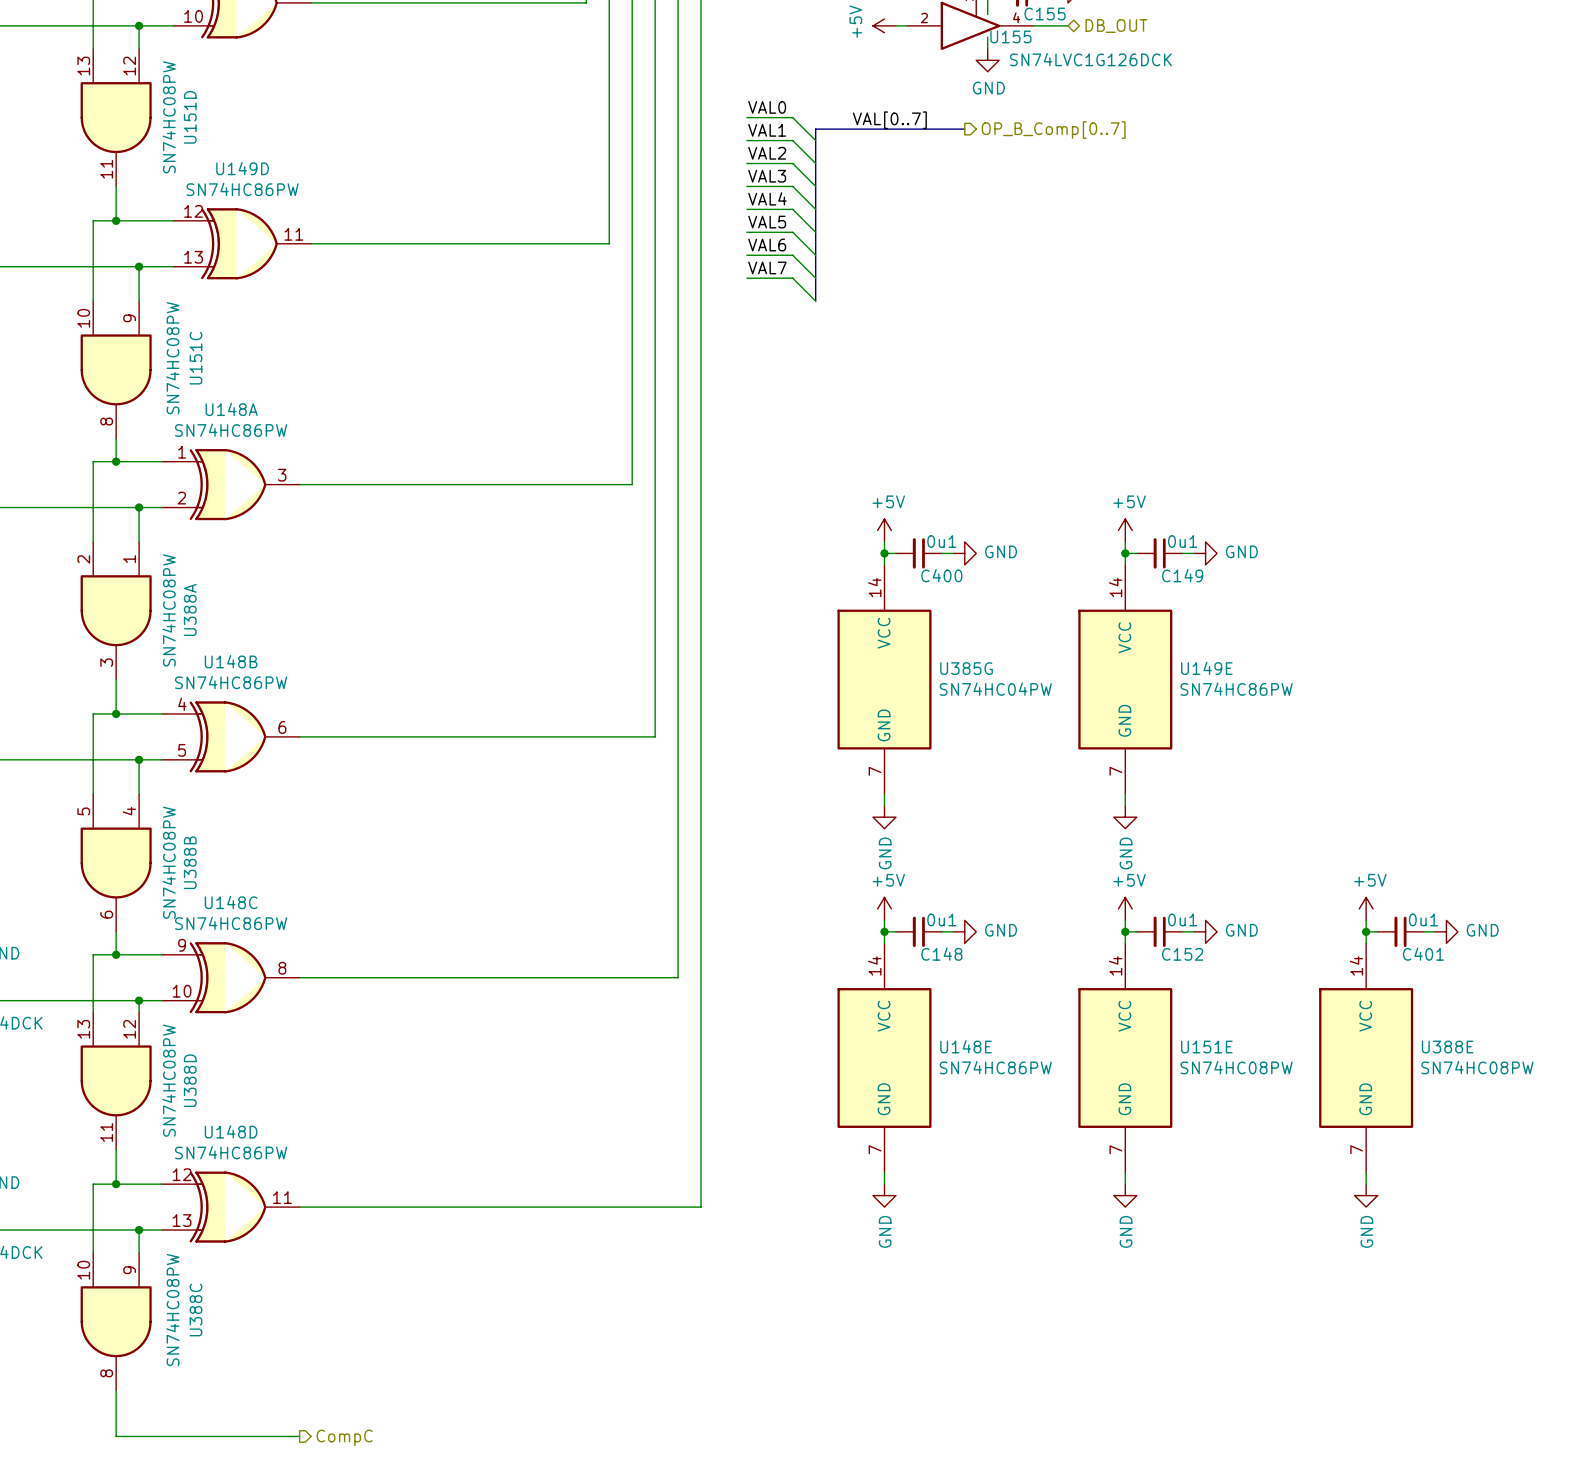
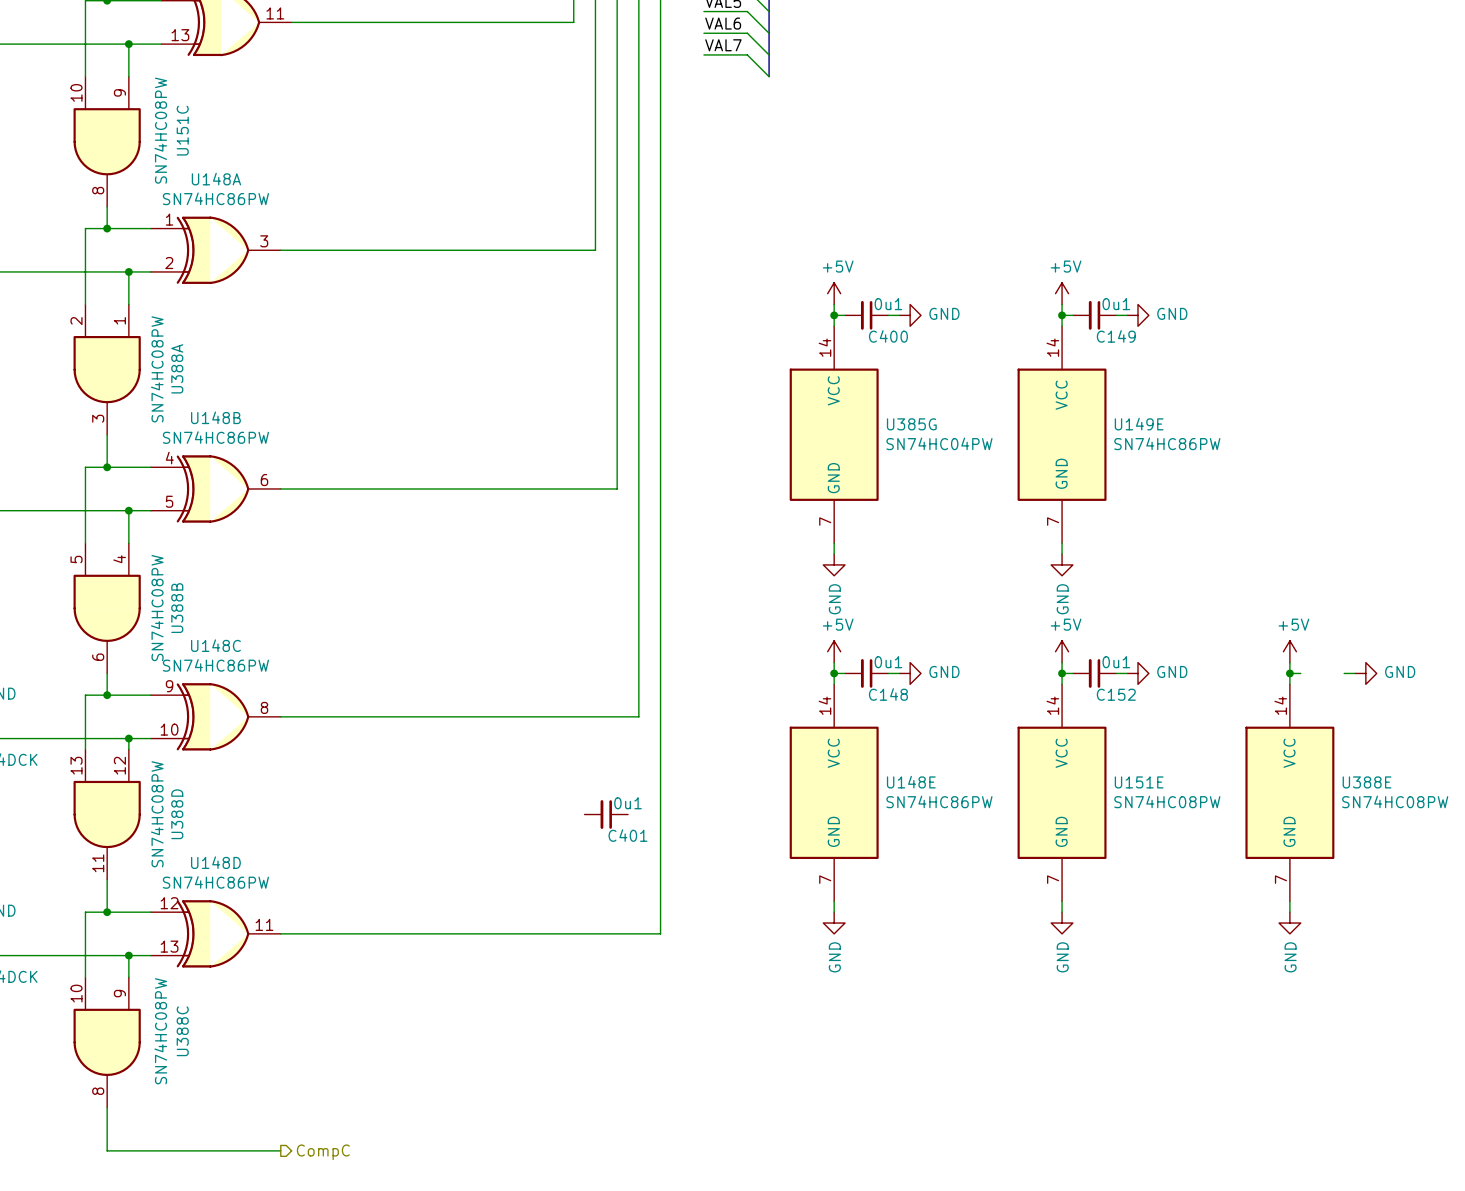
C401 position: (1400, 931) -> (606, 814)

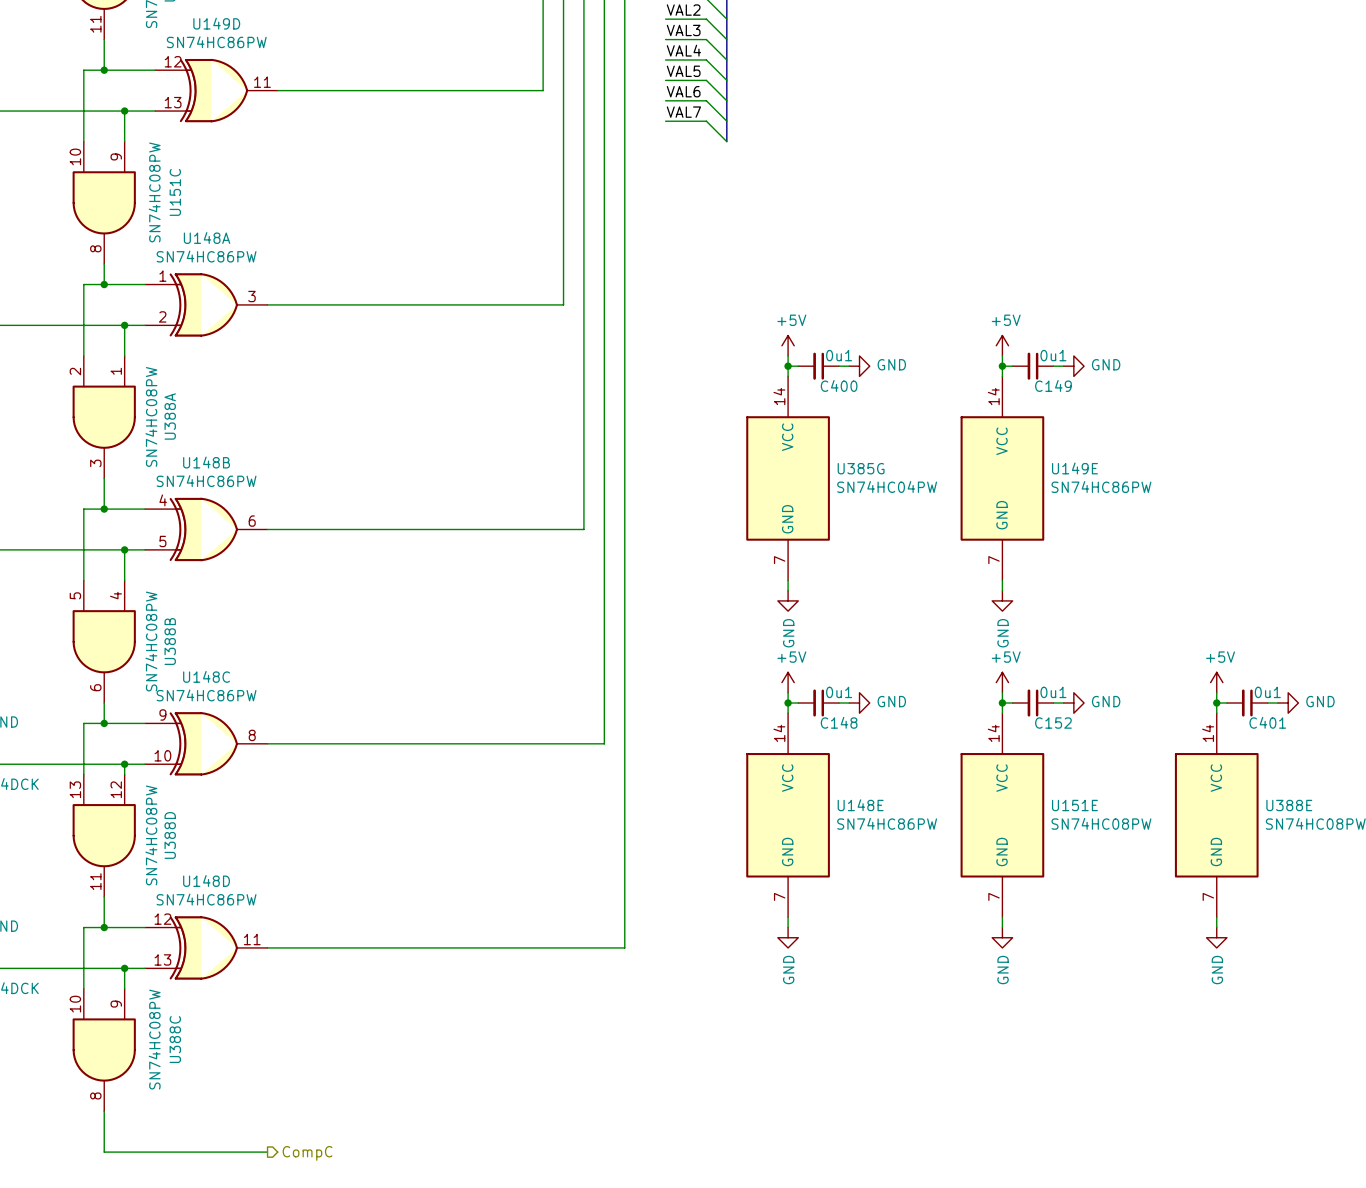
C401 position: (606, 814) -> (1247, 703)

